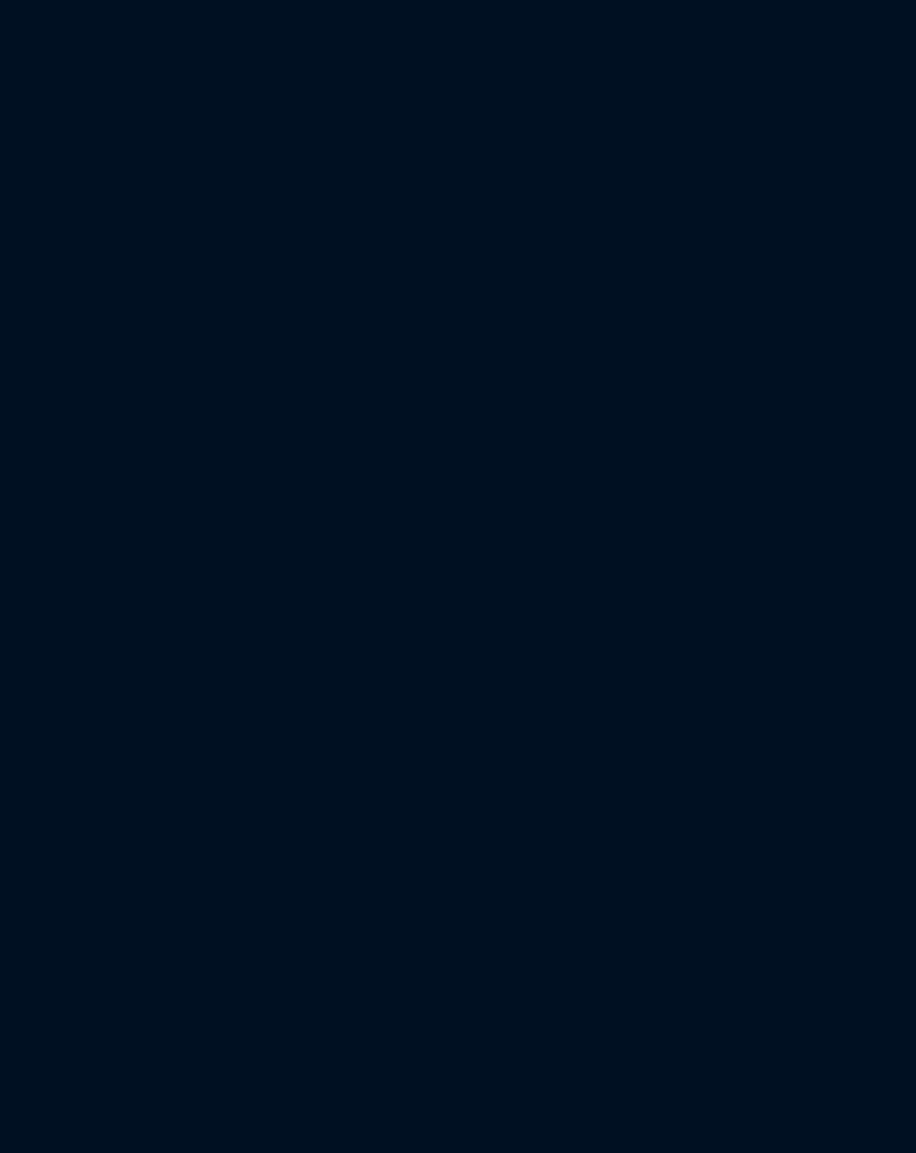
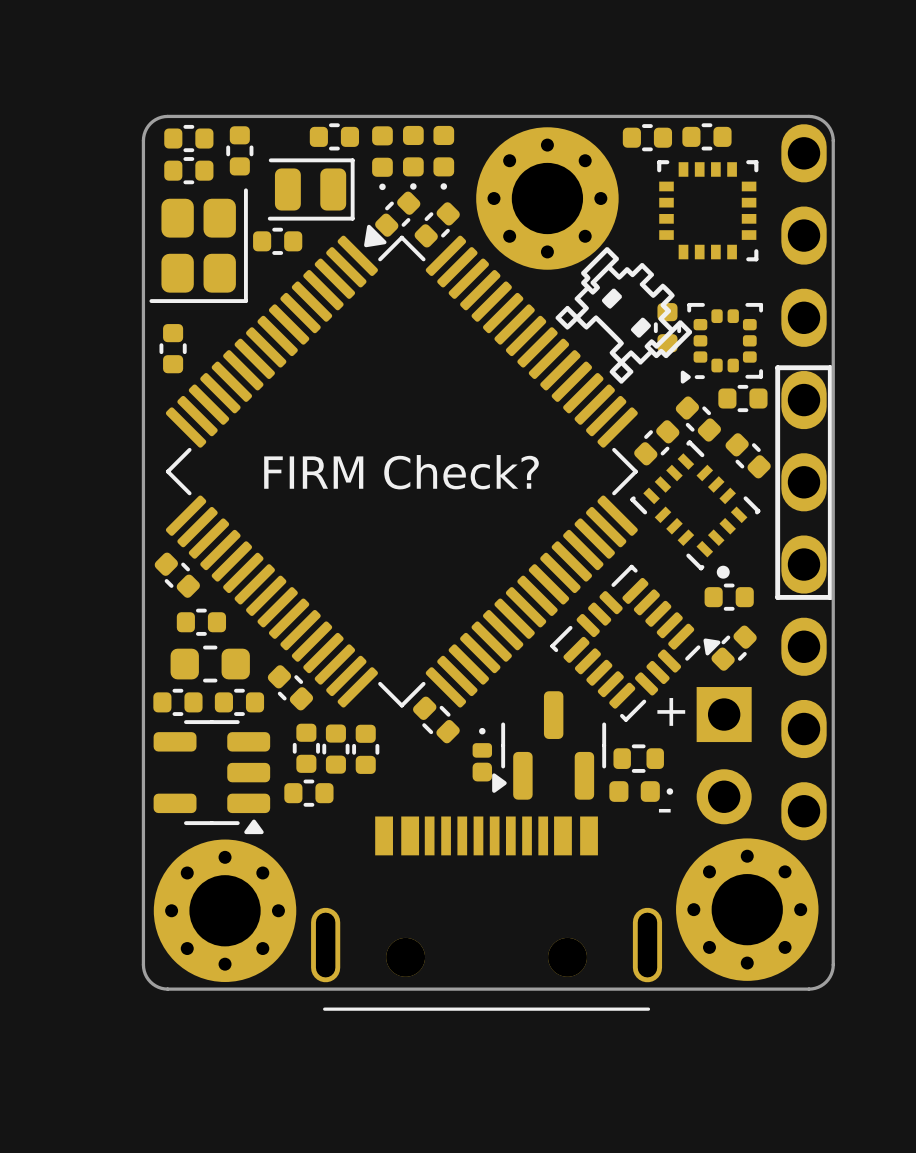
board edge: none -> (167, 116) (808, 116) (821, 119) (828, 125) (833, 140) (833, 964) (831, 974) (823, 984) (808, 989) (167, 989) (158, 987) (148, 979) (143, 964) (143, 140) (145, 131) (150, 123) (158, 118) (167, 116)
part: none -> (334, 136)
part: none -> (706, 136)
part: none -> (647, 137)
part: none -> (188, 138)
part: none -> (239, 150)
part: none -> (804, 153)
part: none -> (413, 157)
part: none -> (443, 157)
part: none -> (382, 158)
part: none -> (188, 170)
part: none -> (311, 189)
part: none -> (547, 198)
part: none -> (707, 210)
part: none -> (397, 214)
part: none -> (437, 224)
part: none -> (804, 235)
part: none -> (277, 241)
part: none -> (198, 245)
drawing: none -> [555, 247, 693, 384]
part: none -> (804, 317)
part: none -> (667, 327)
part: none -> (721, 343)
part: none -> (173, 348)
line: none -> (777, 367) (830, 367) (830, 597) (777, 597) (777, 367)
part: none -> (742, 398)
part: none -> (804, 400)
part: none -> (698, 419)
part: none -> (656, 442)
part: none -> (748, 455)
part: none -> (401, 466)
text: none -> FIRM Check? (401, 472)
part: none -> (804, 482)
part: none -> (695, 509)
part: none -> (804, 564)
part: none -> (177, 575)
part: none -> (729, 597)
part: none -> (201, 622)
part: none -> (635, 643)
part: none -> (804, 646)
part: none -> (734, 648)
part: none -> (210, 664)
part: none -> (290, 687)
part: none -> (177, 702)
part: none -> (239, 702)
text: none -> + (671, 711)
part: none -> (436, 719)
part: none -> (804, 729)
part: none -> (549, 745)
part: none -> (306, 748)
part: none -> (335, 749)
part: none -> (365, 749)
part: none -> (482, 754)
part: none -> (724, 755)
part: none -> (638, 758)
part: none -> (211, 777)
part: none -> (641, 791)
part: none -> (308, 793)
text: none -> - (664, 810)
part: none -> (804, 811)
part: none -> (747, 909)
part: none -> (225, 910)
part: none -> (486, 913)

